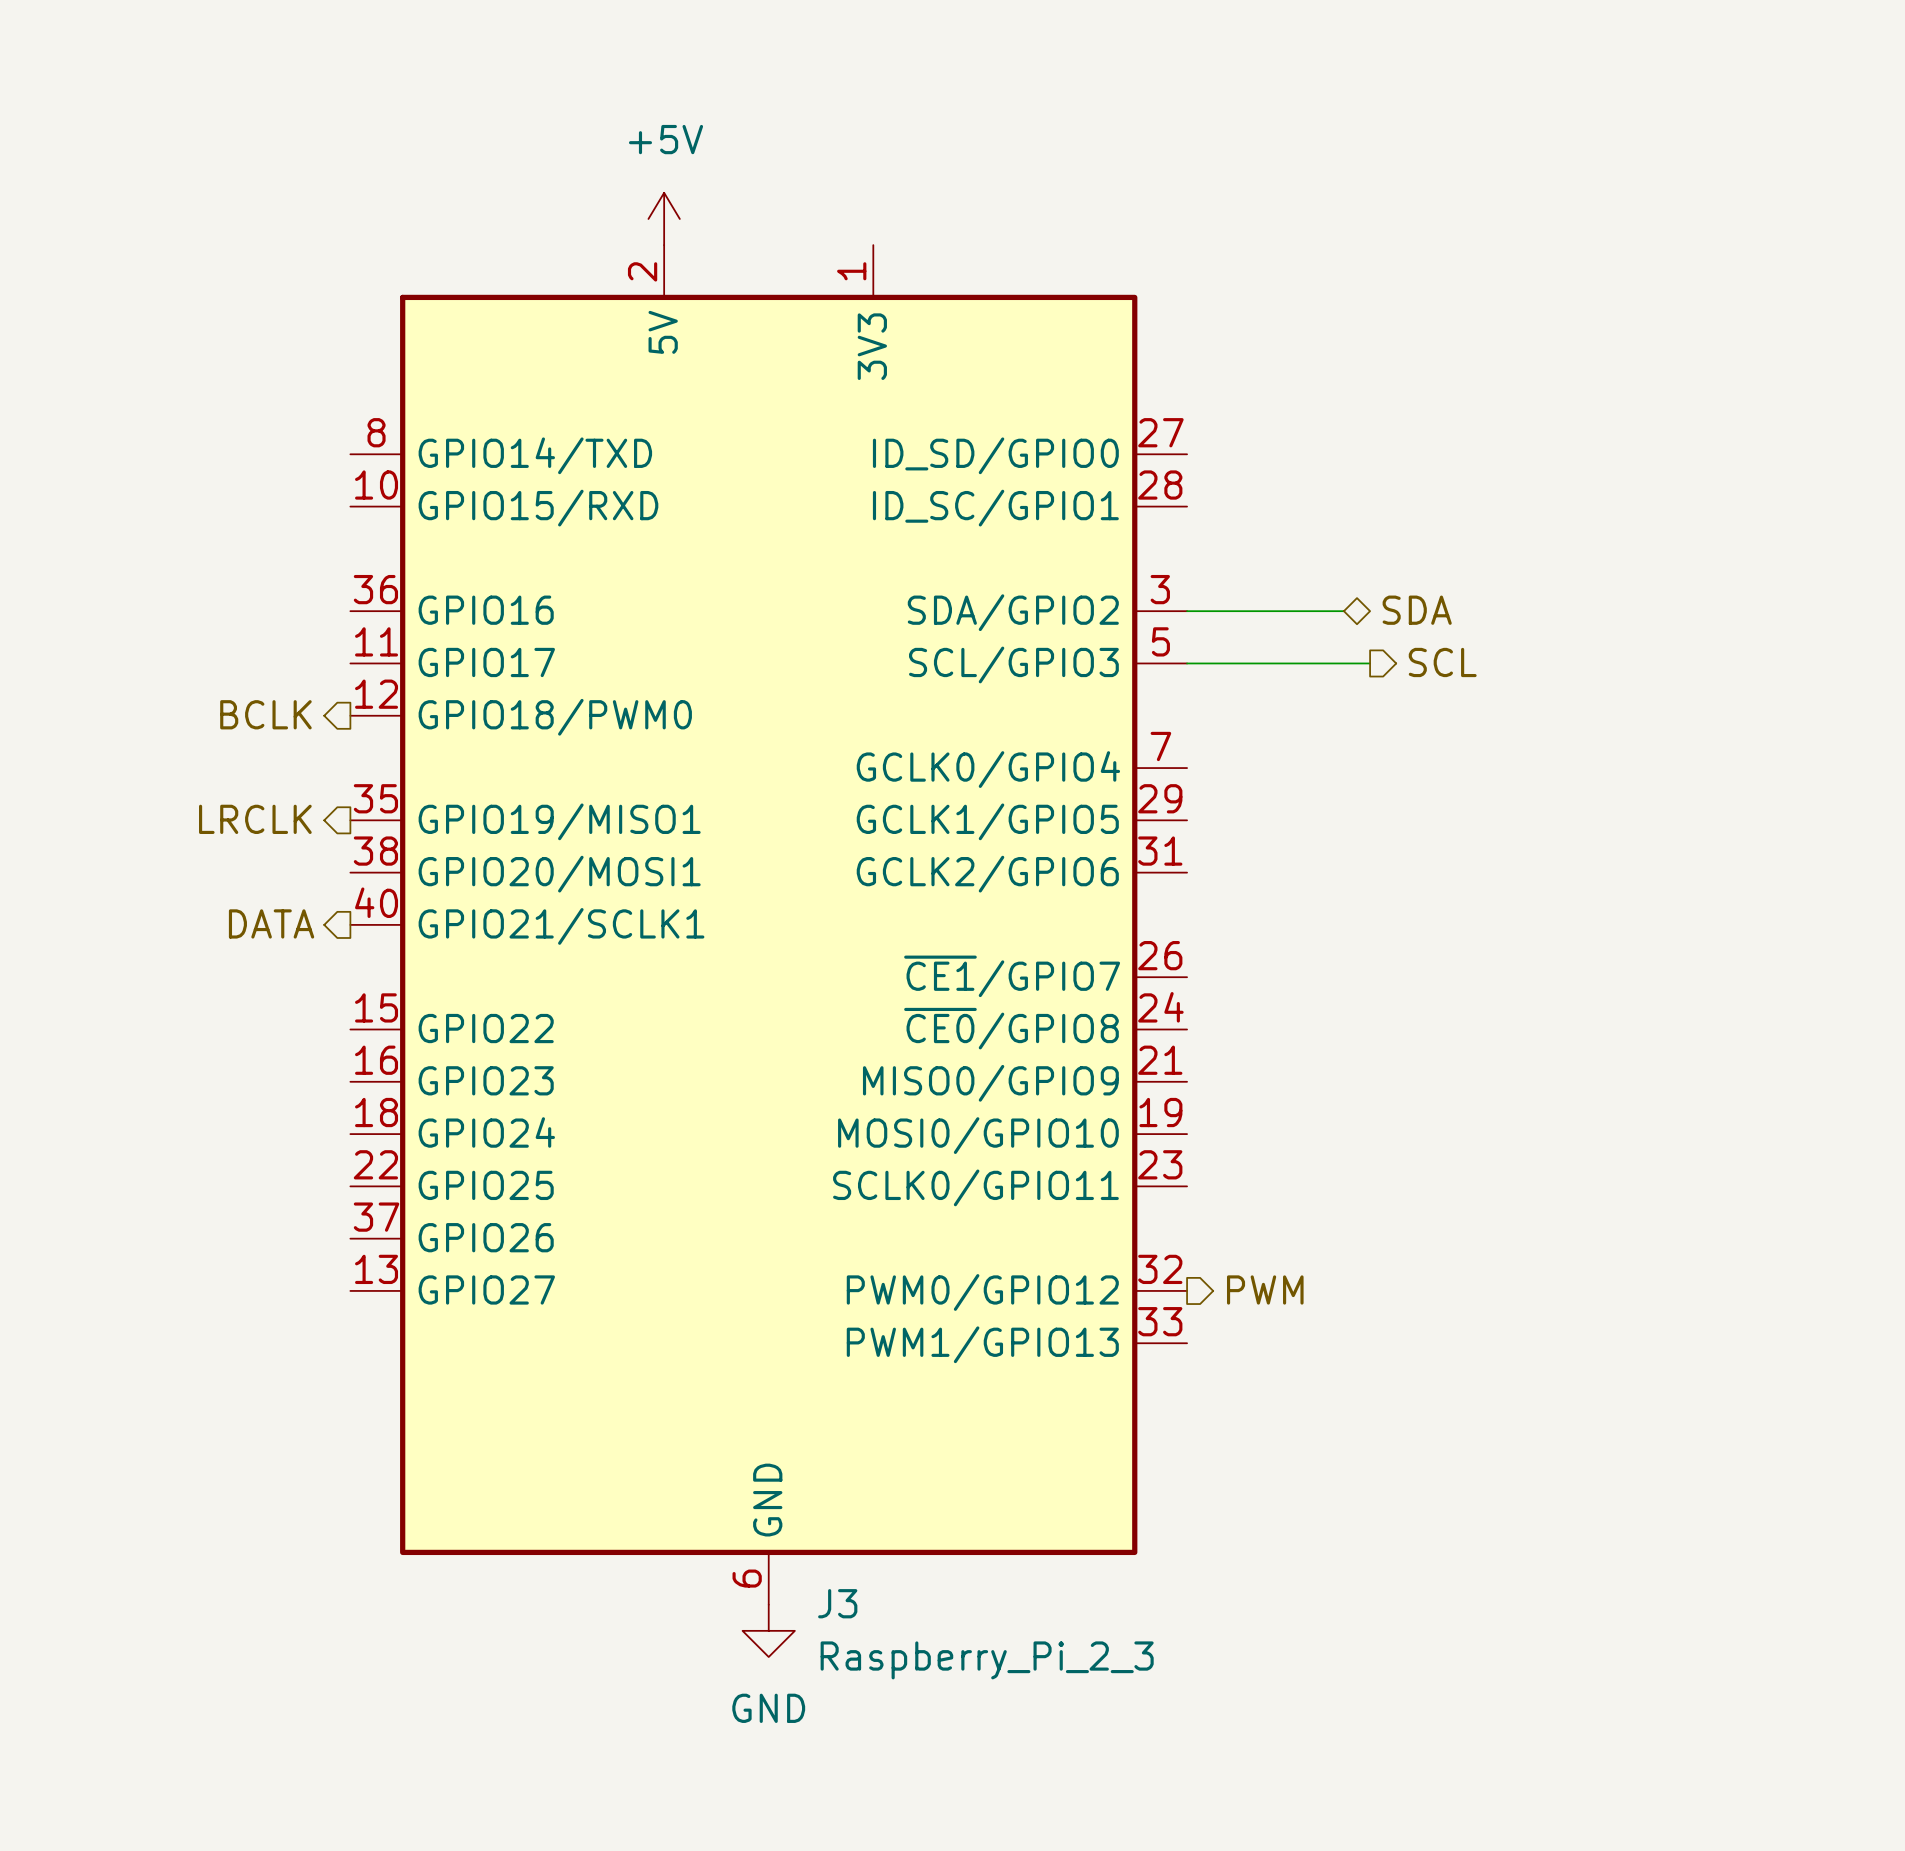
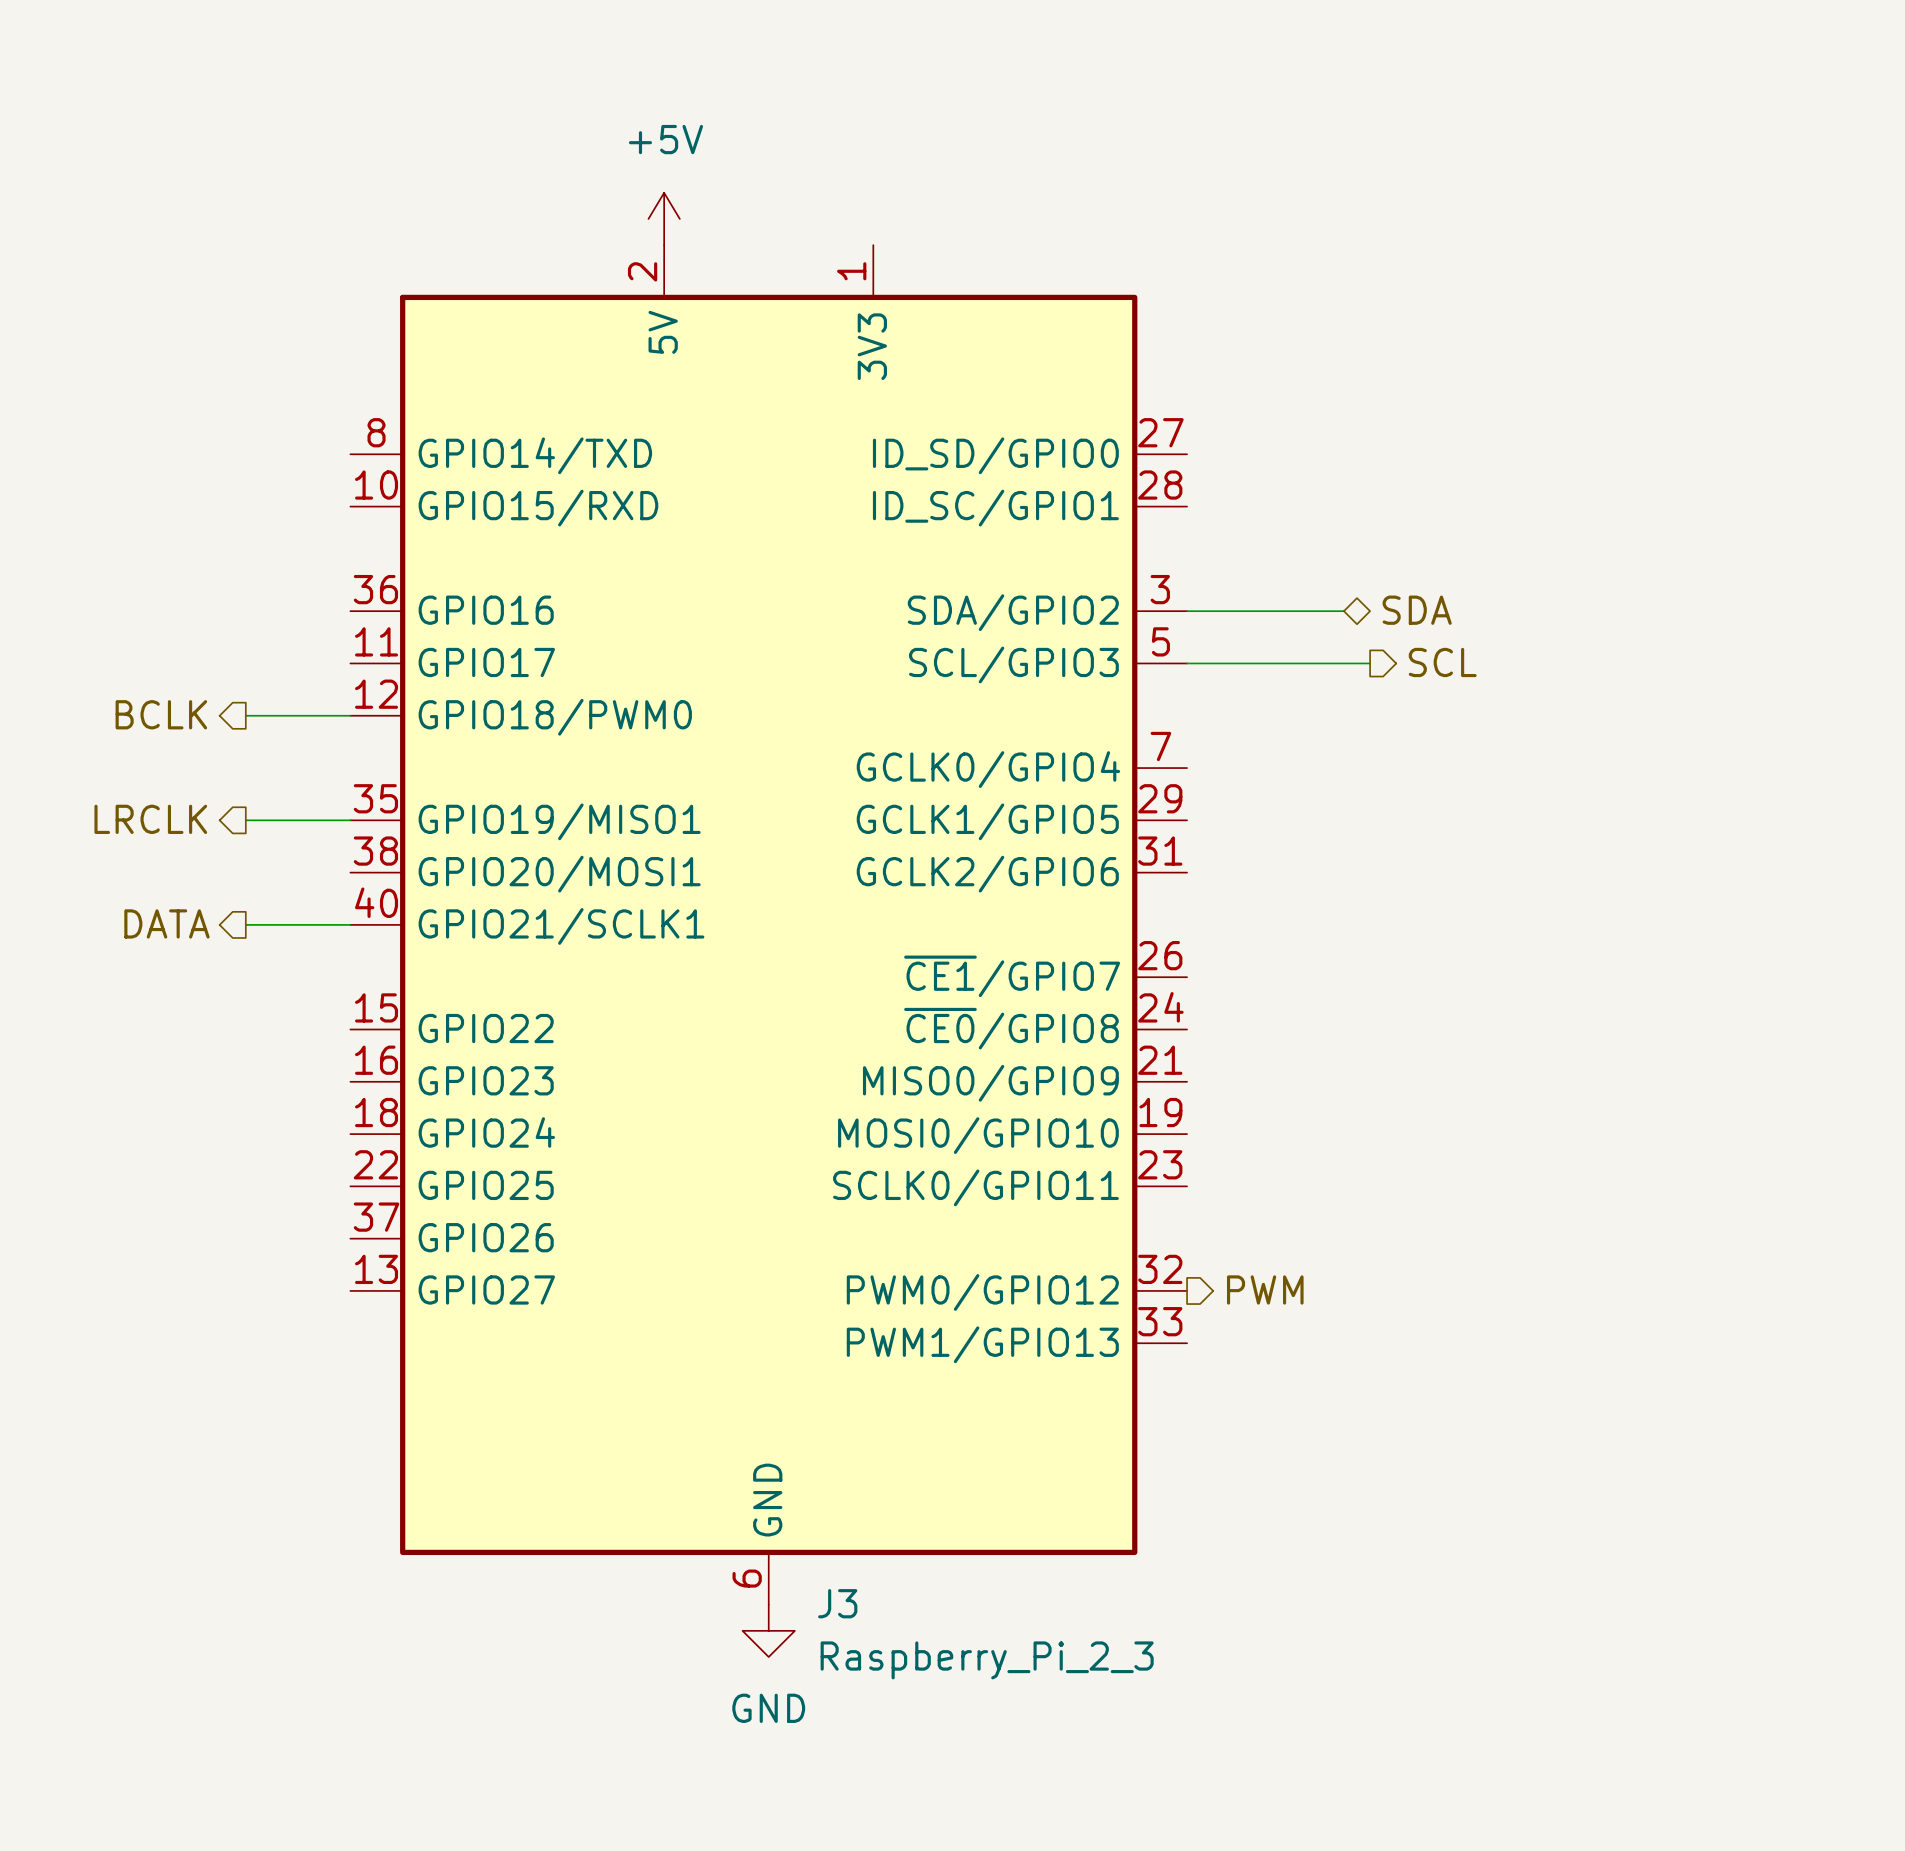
hierarchical label position: BCLK (265, 714) -> BCLK (161, 714)
wire: none -> (245, 715) (350, 715)
hierarchical label position: LRCLK (255, 819) -> LRCLK (150, 819)
wire: none -> (245, 820) (350, 820)
hierarchical label position: DATA (271, 923) -> DATA (166, 923)
wire: none -> (245, 924) (350, 924)

